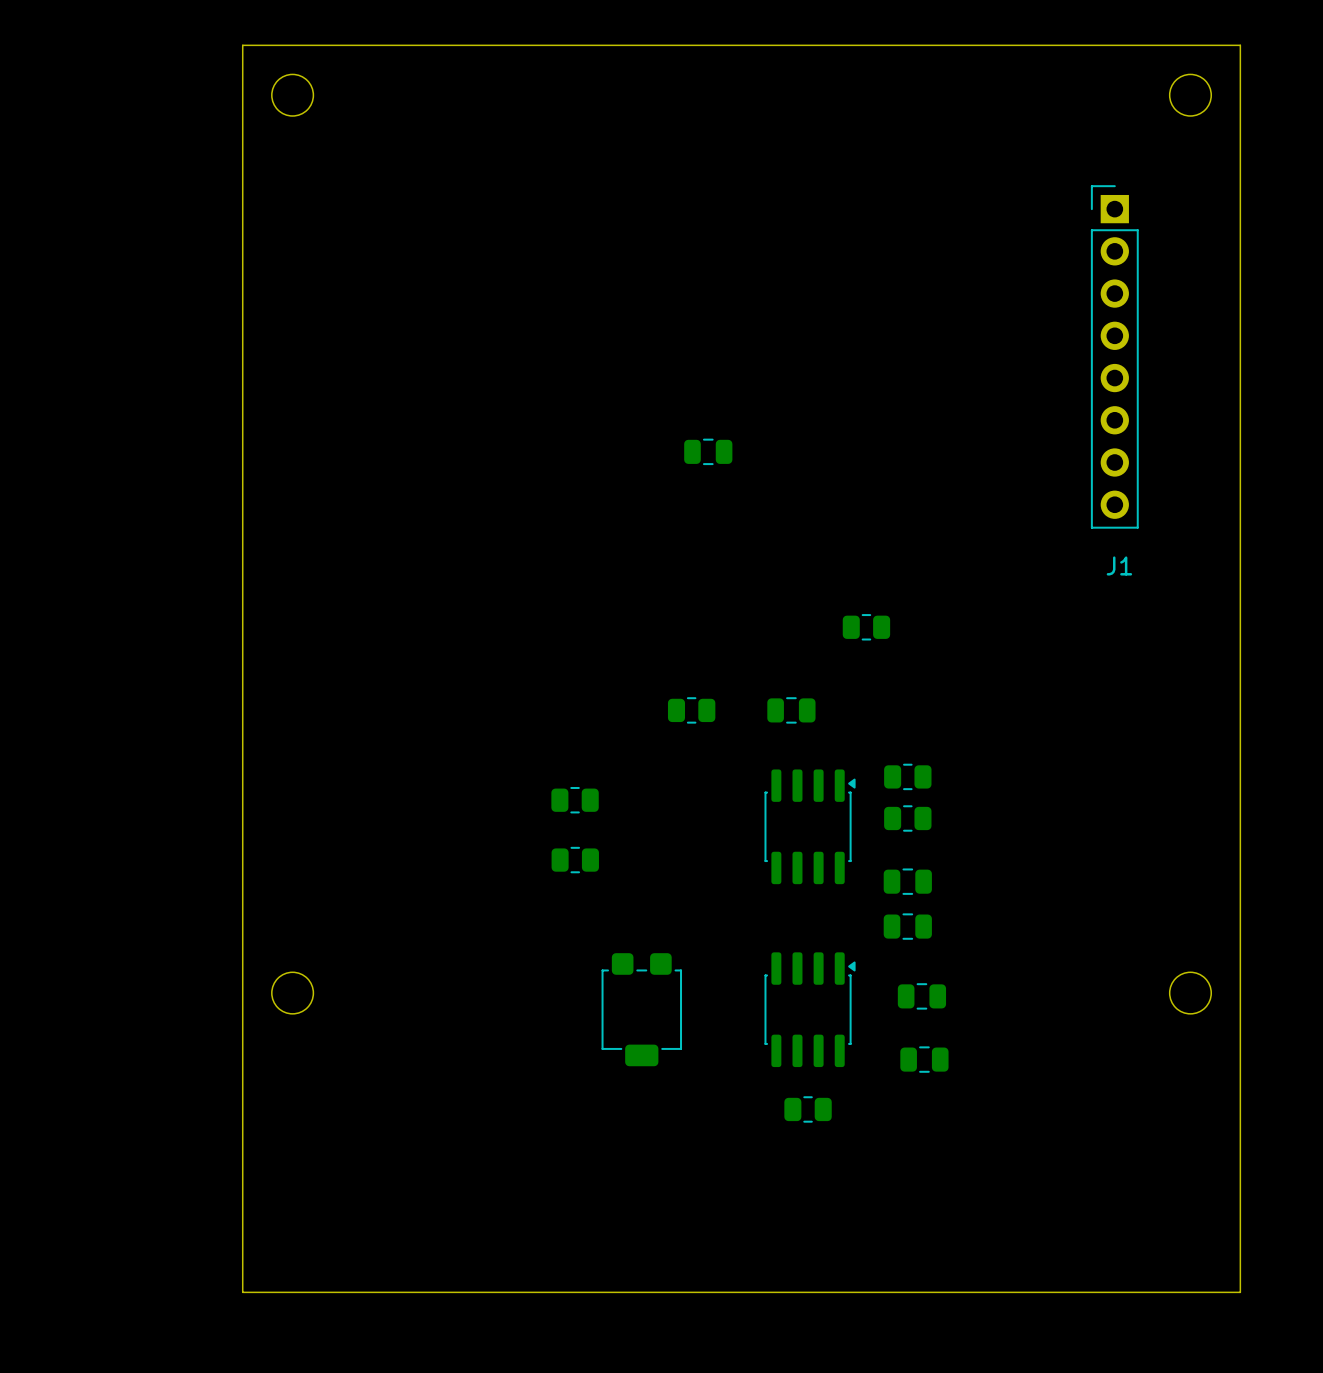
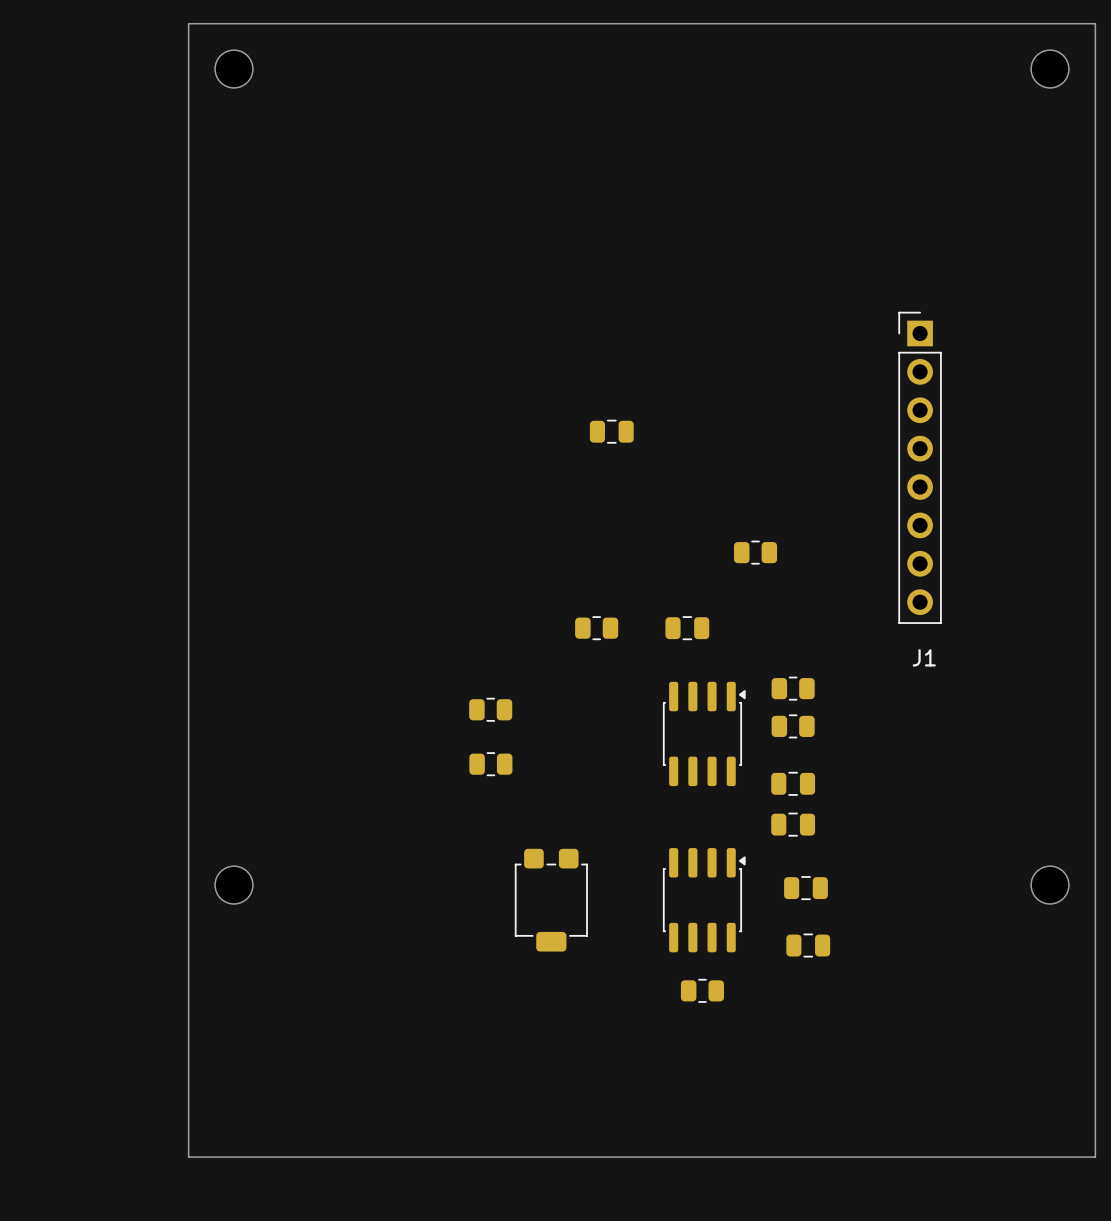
J1 position: (1114, 356) -> (920, 467)
part position: (708, 451) -> (611, 431)

